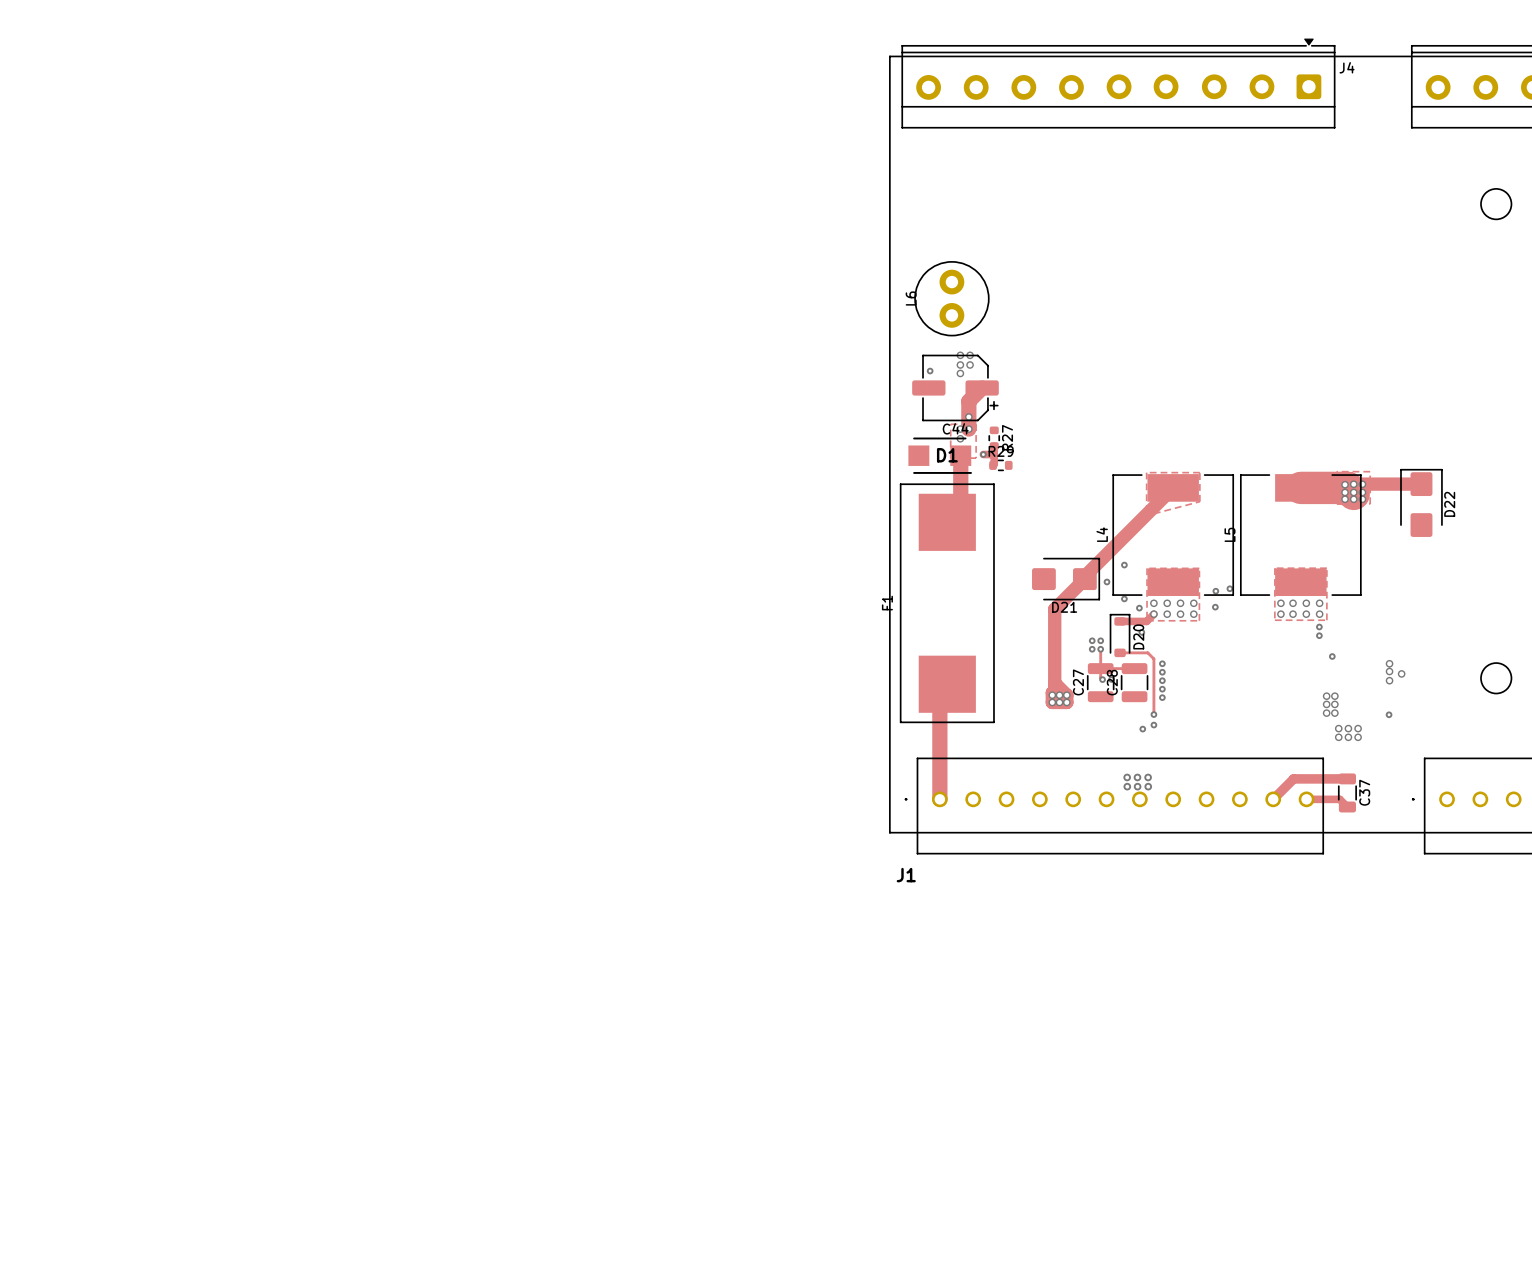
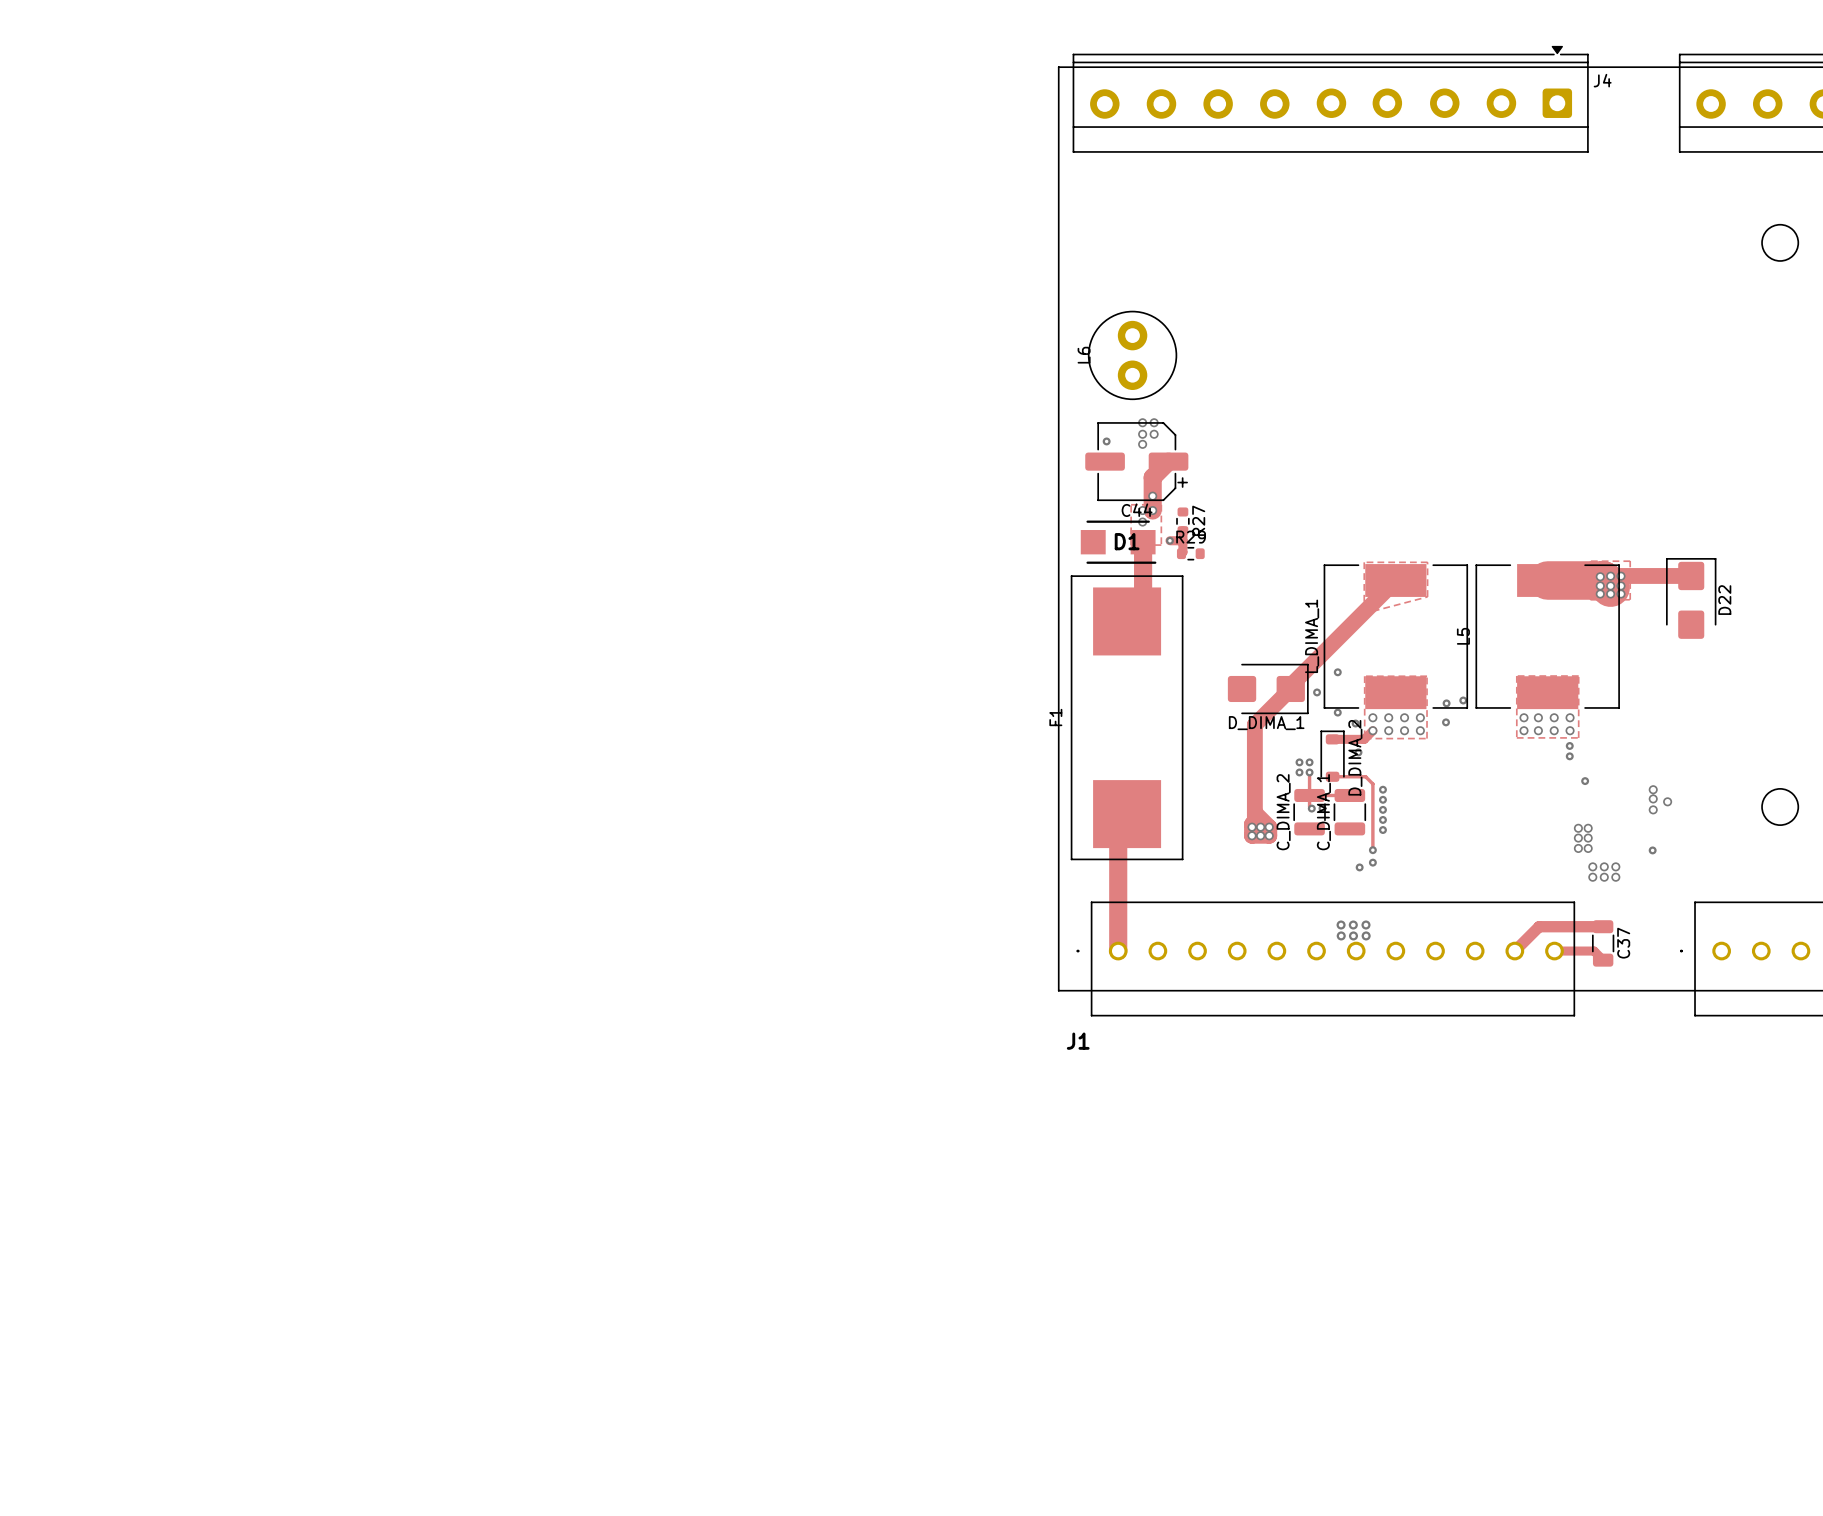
L4 name: L4 (1102, 534) -> L_DIMA_1 (1312, 636)
D21 name: D21 (1064, 607) -> D_DIMA_1 (1266, 723)
D20 name: D20 (1138, 636) -> D_DIMA_2 (1355, 757)
C27 name: C27 (1078, 682) -> C_DIMA_2 (1283, 812)
C28 name: C28 (1112, 682) -> C_DIMA_1 (1323, 812)

